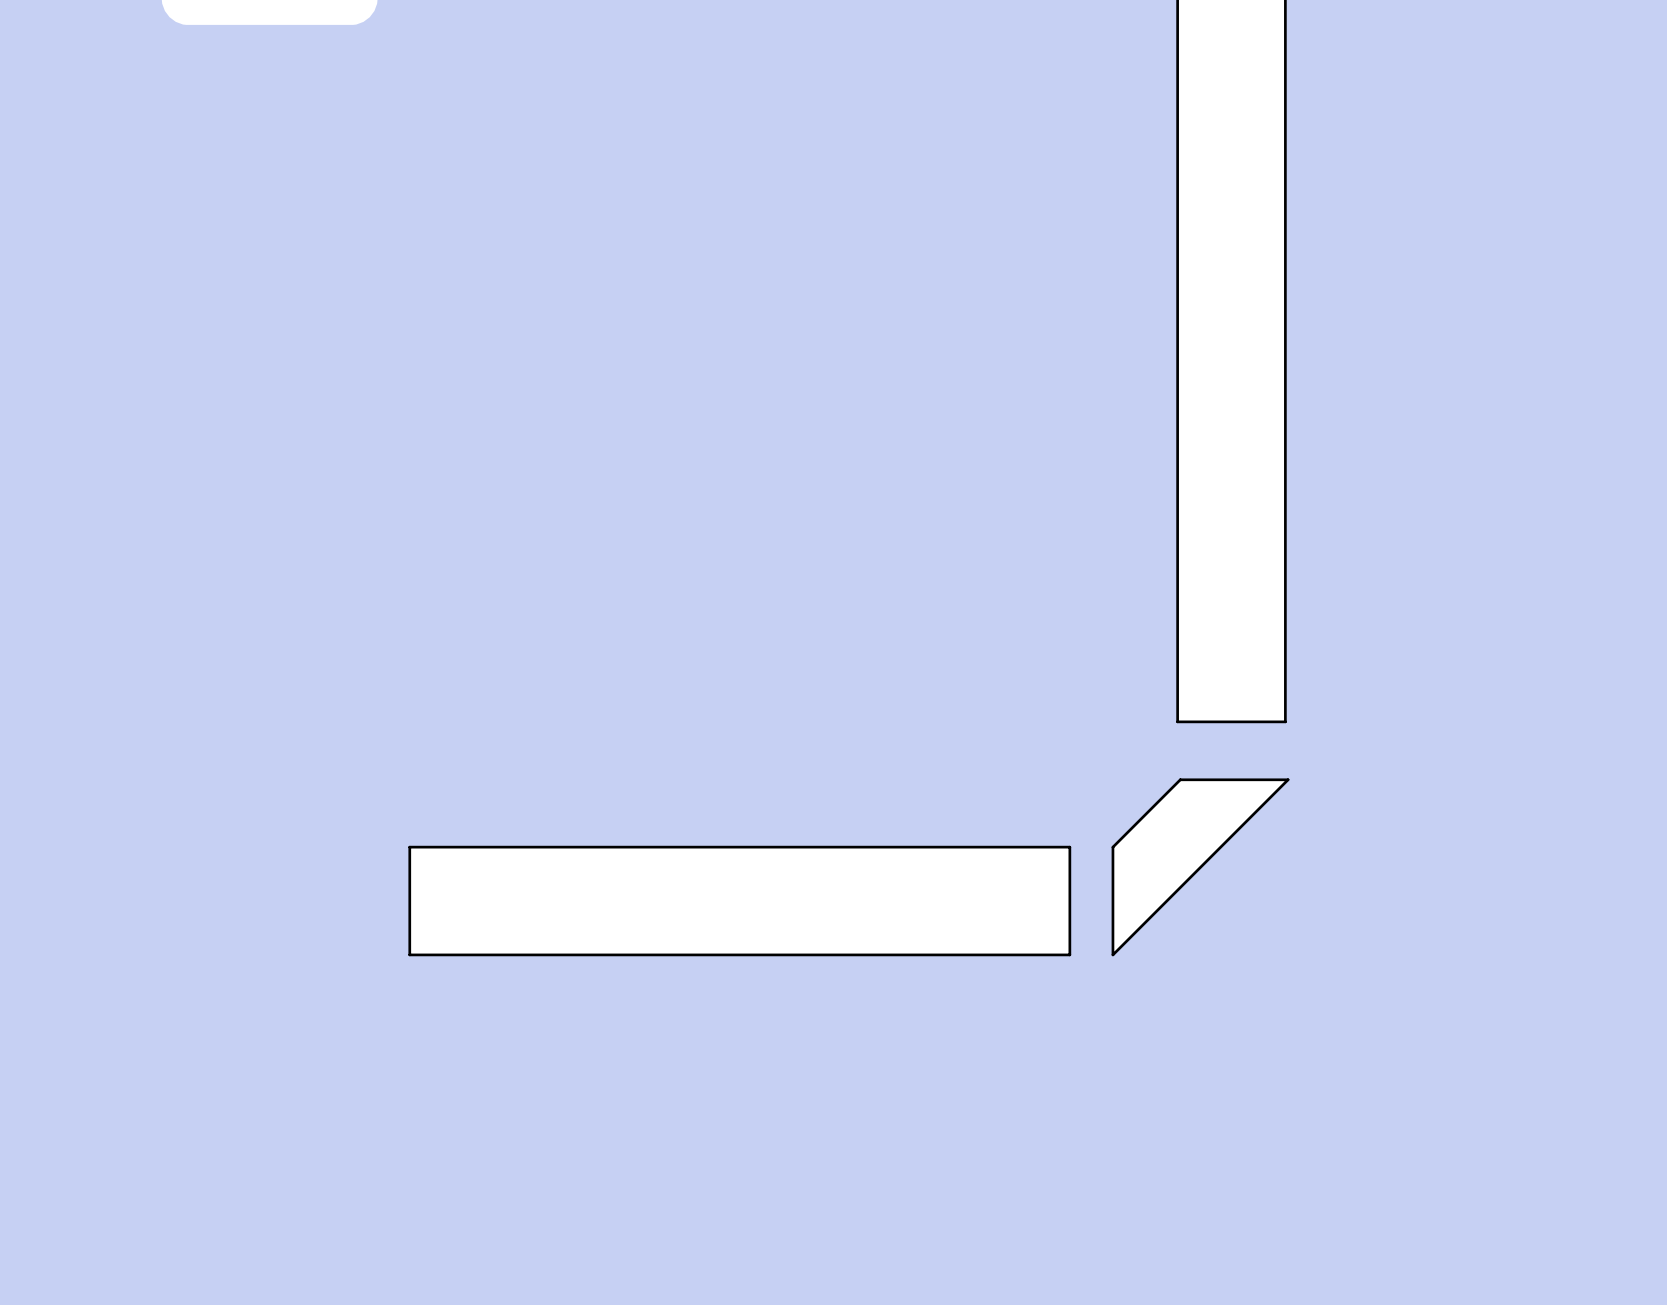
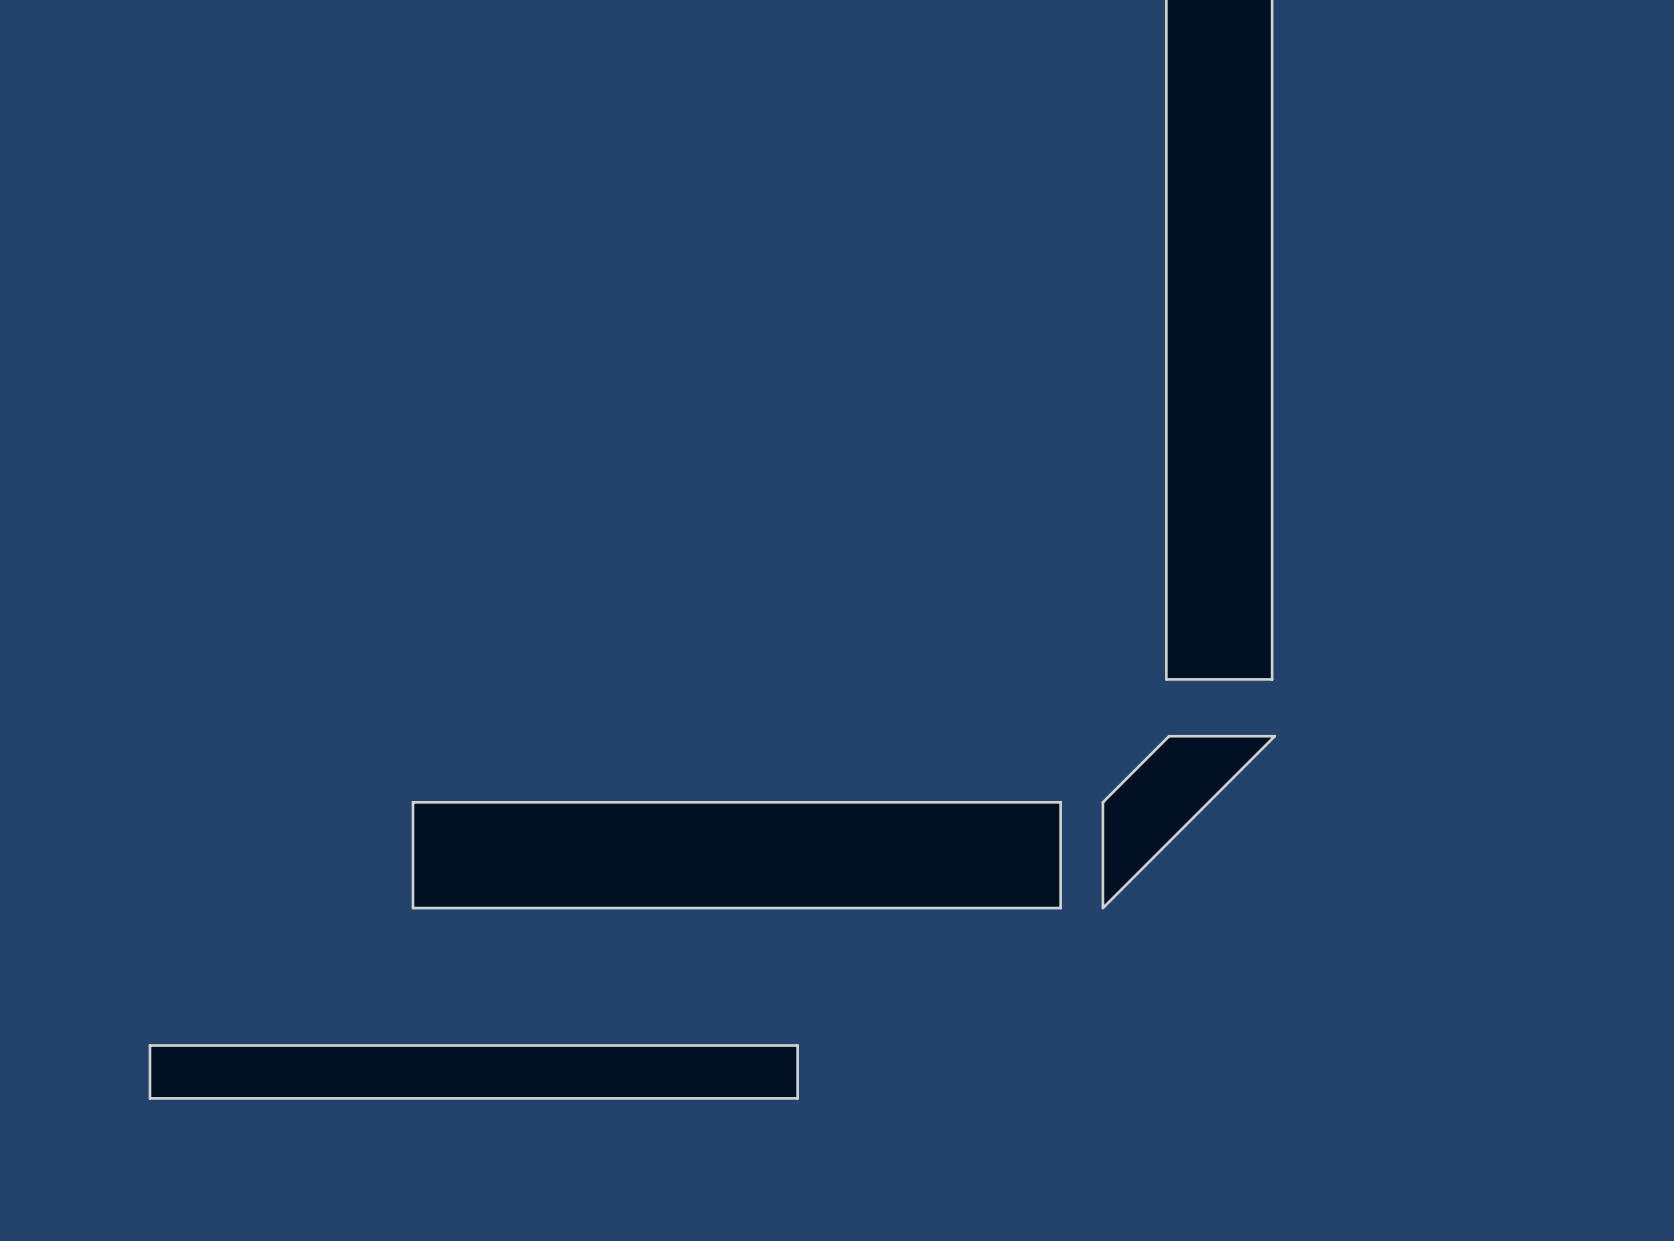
board edge: none -> (797, 1045) (149, 1045) (149, 1098) (797, 1098) (797, 1045)

